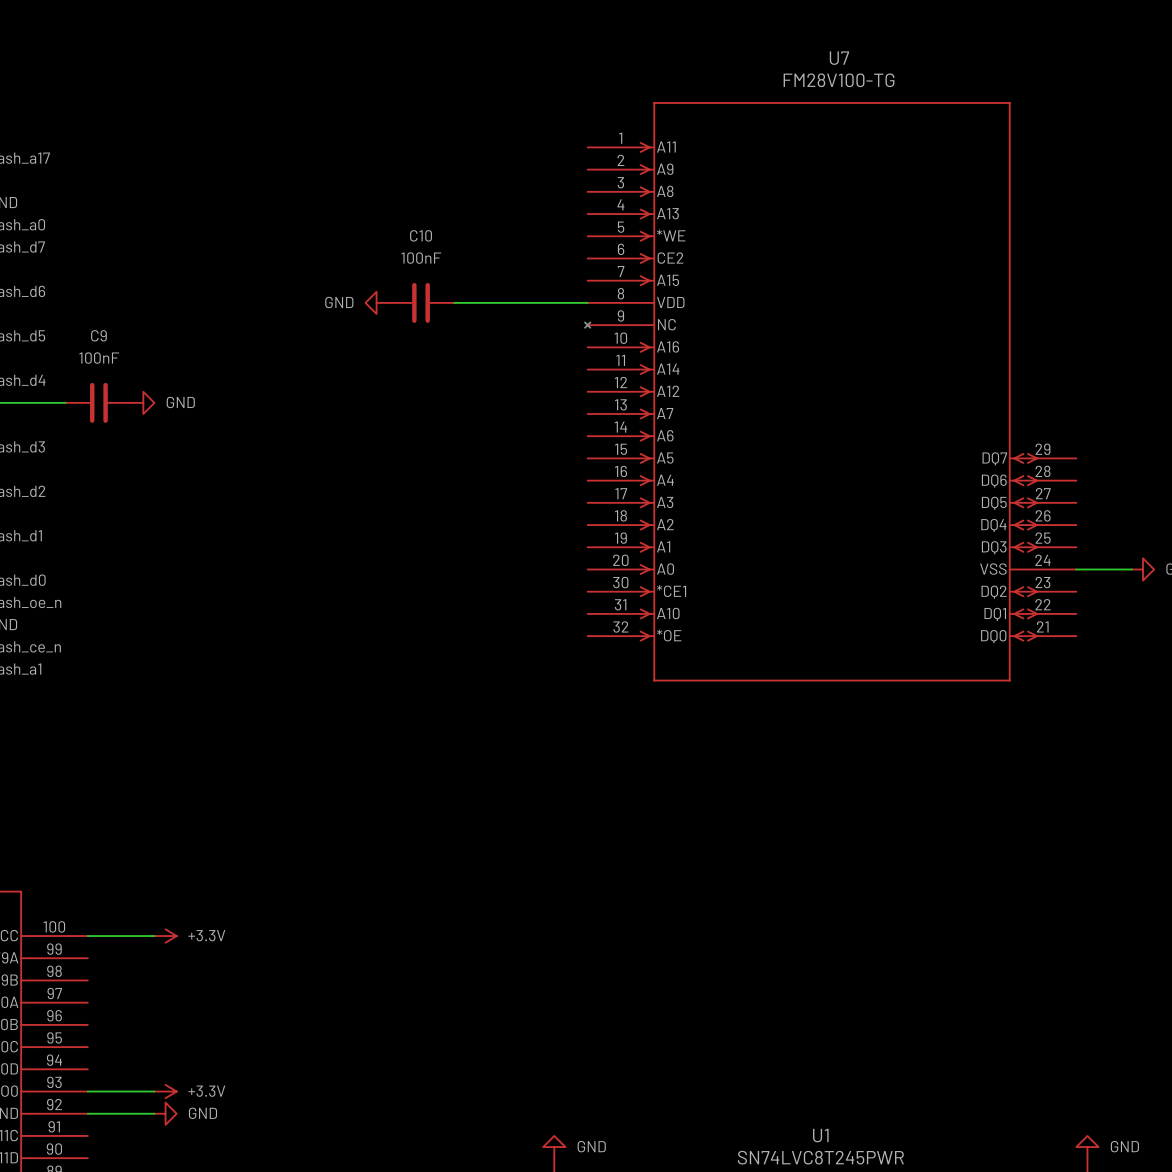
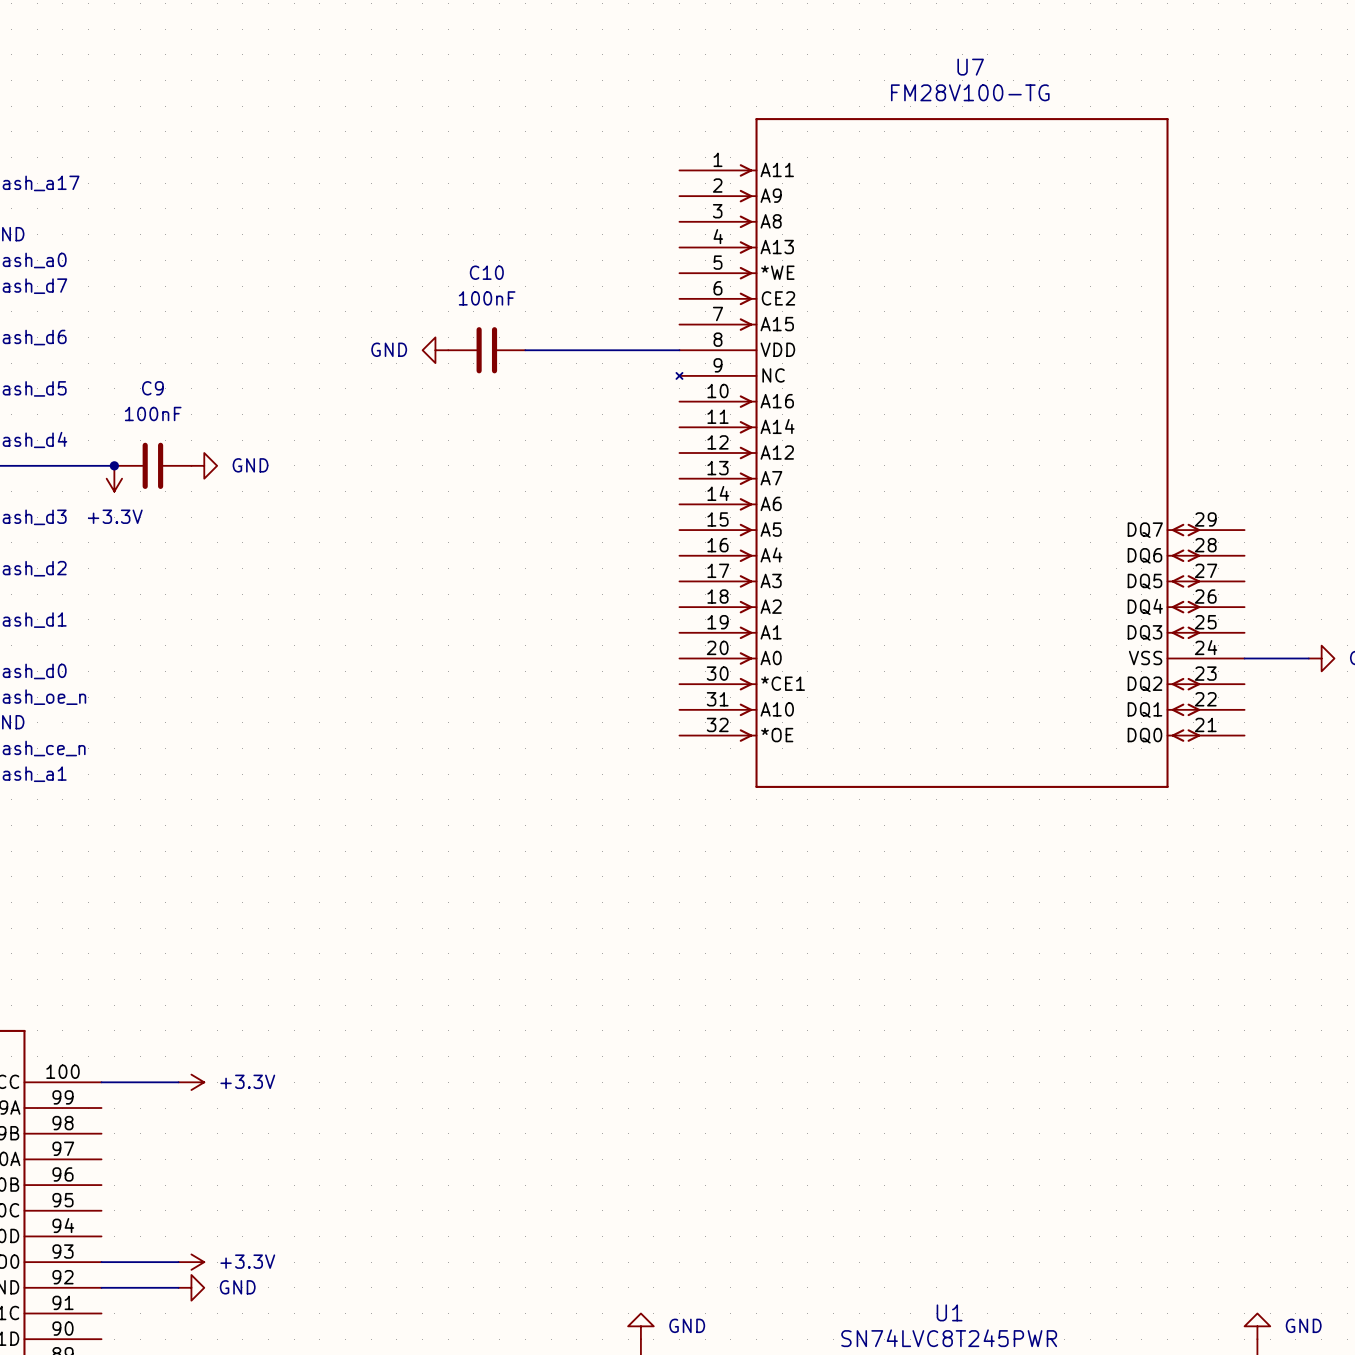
C9 position: (98, 402) -> (152, 465)
junction: none -> (114, 465)
power symbol position: GND (143, 402) -> GND (204, 465)
power symbol: none -> +3.3V (114, 478)

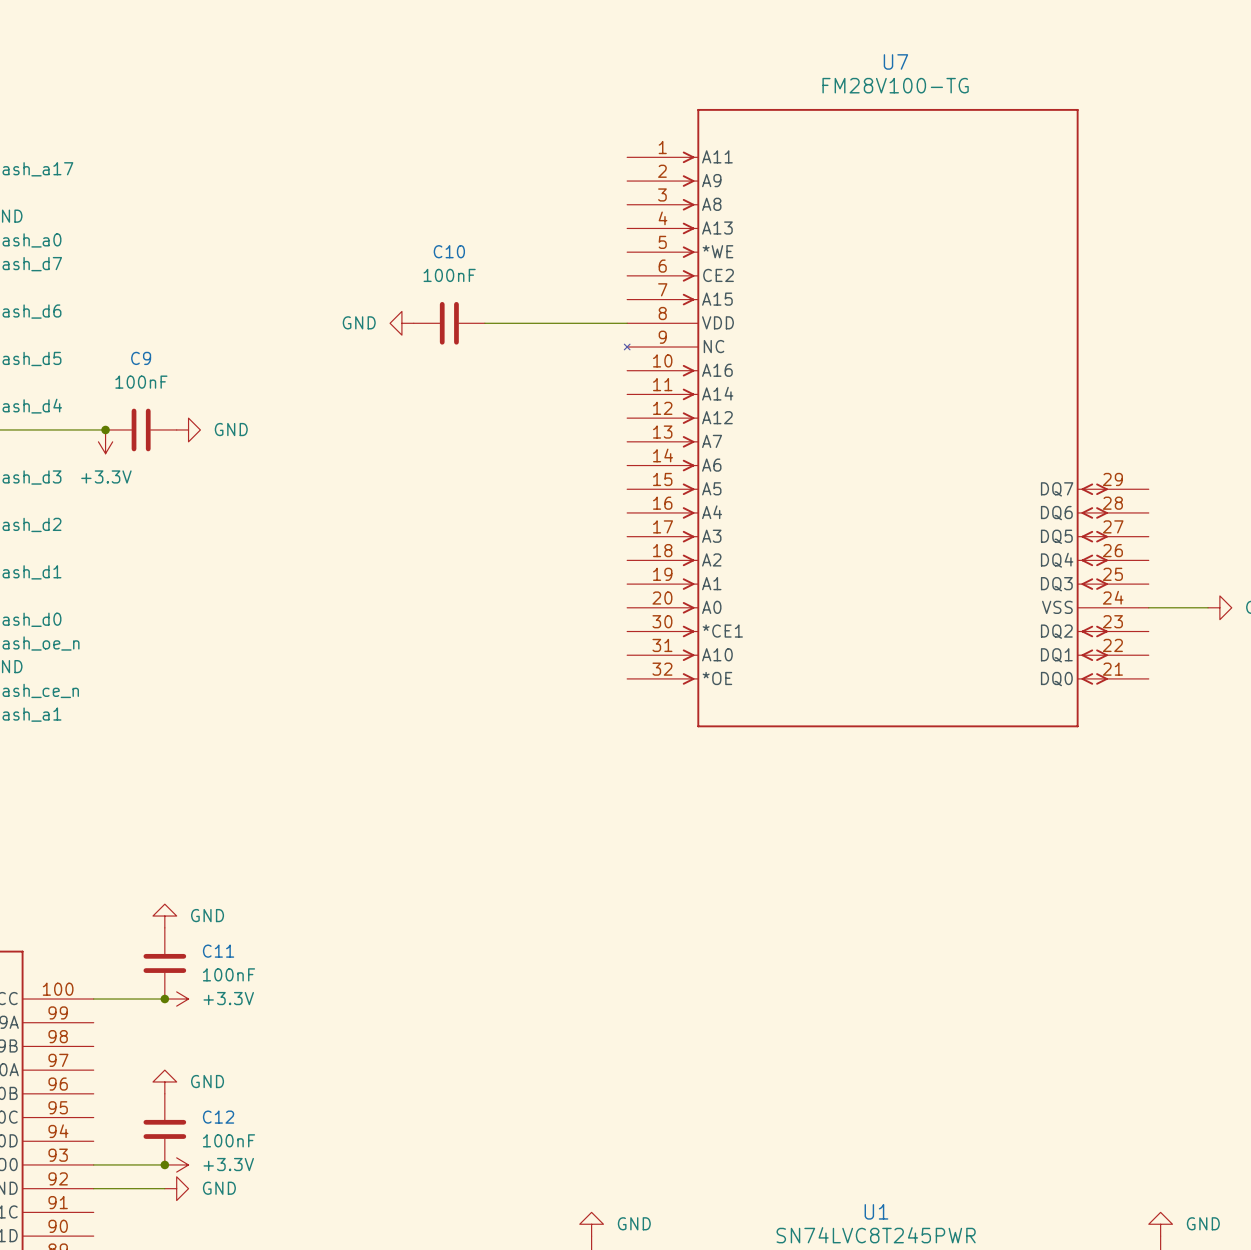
power symbol: none -> GND (164, 916)
C11: none -> 100nF (164, 963)
junction: none -> (164, 999)
power symbol: none -> GND (164, 1081)
C12: none -> 100nF (164, 1129)
junction: none -> (164, 1164)

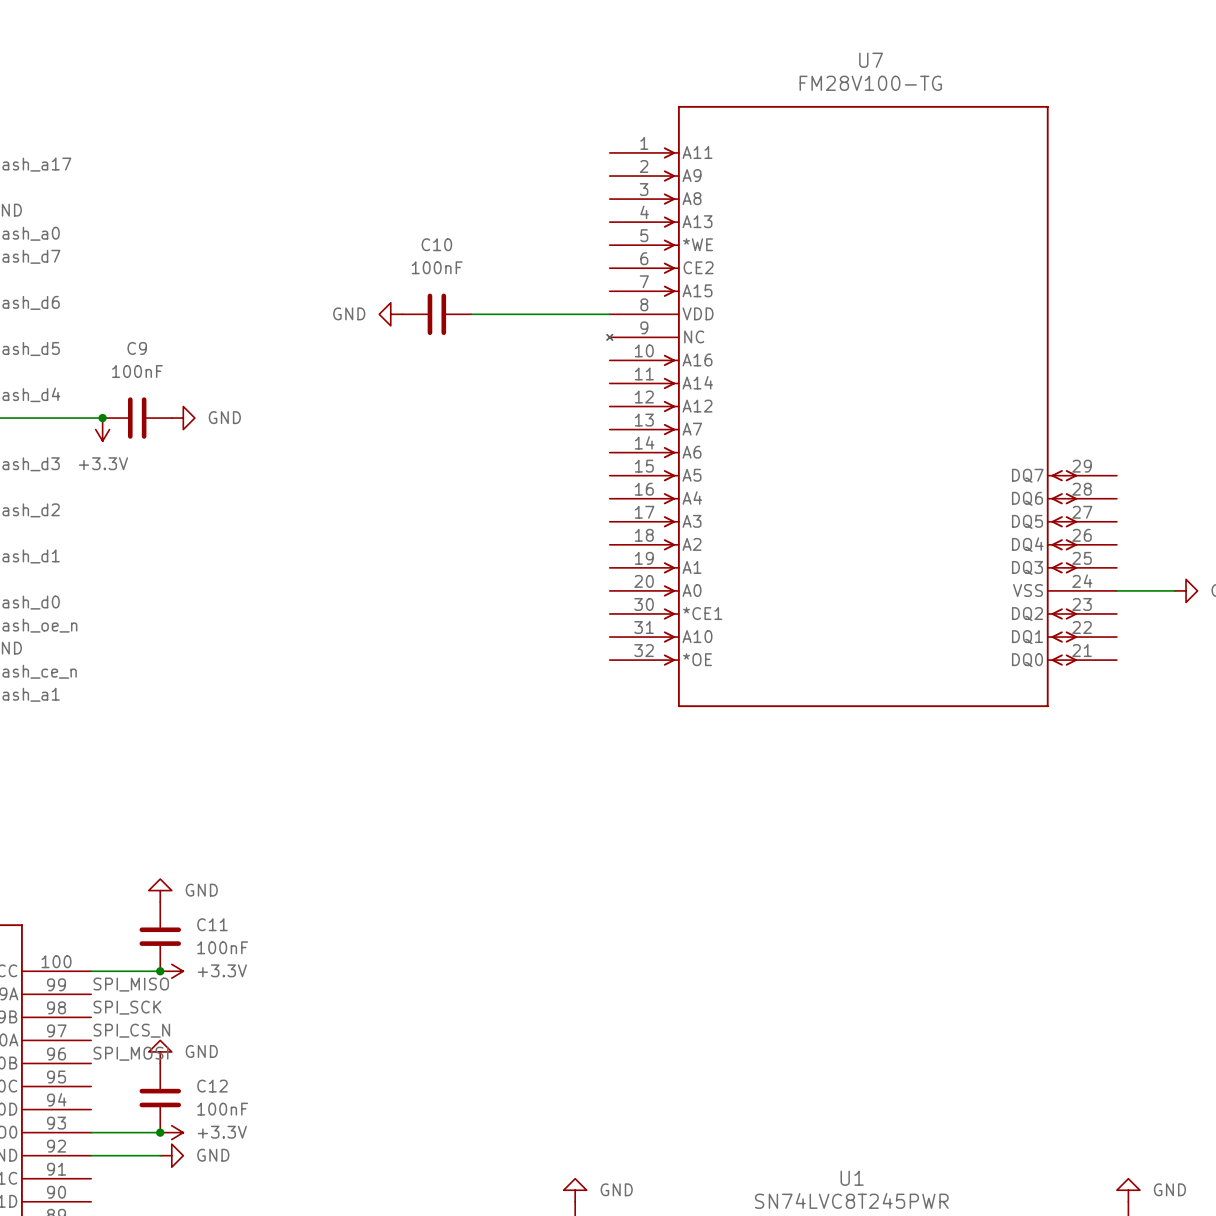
label: none -> SPI_MISO (131, 984)
label: none -> SPI_SCK (127, 1007)
label: none -> SPI_CS_N (131, 1030)
label: none -> SPI_MOSI (130, 1053)

